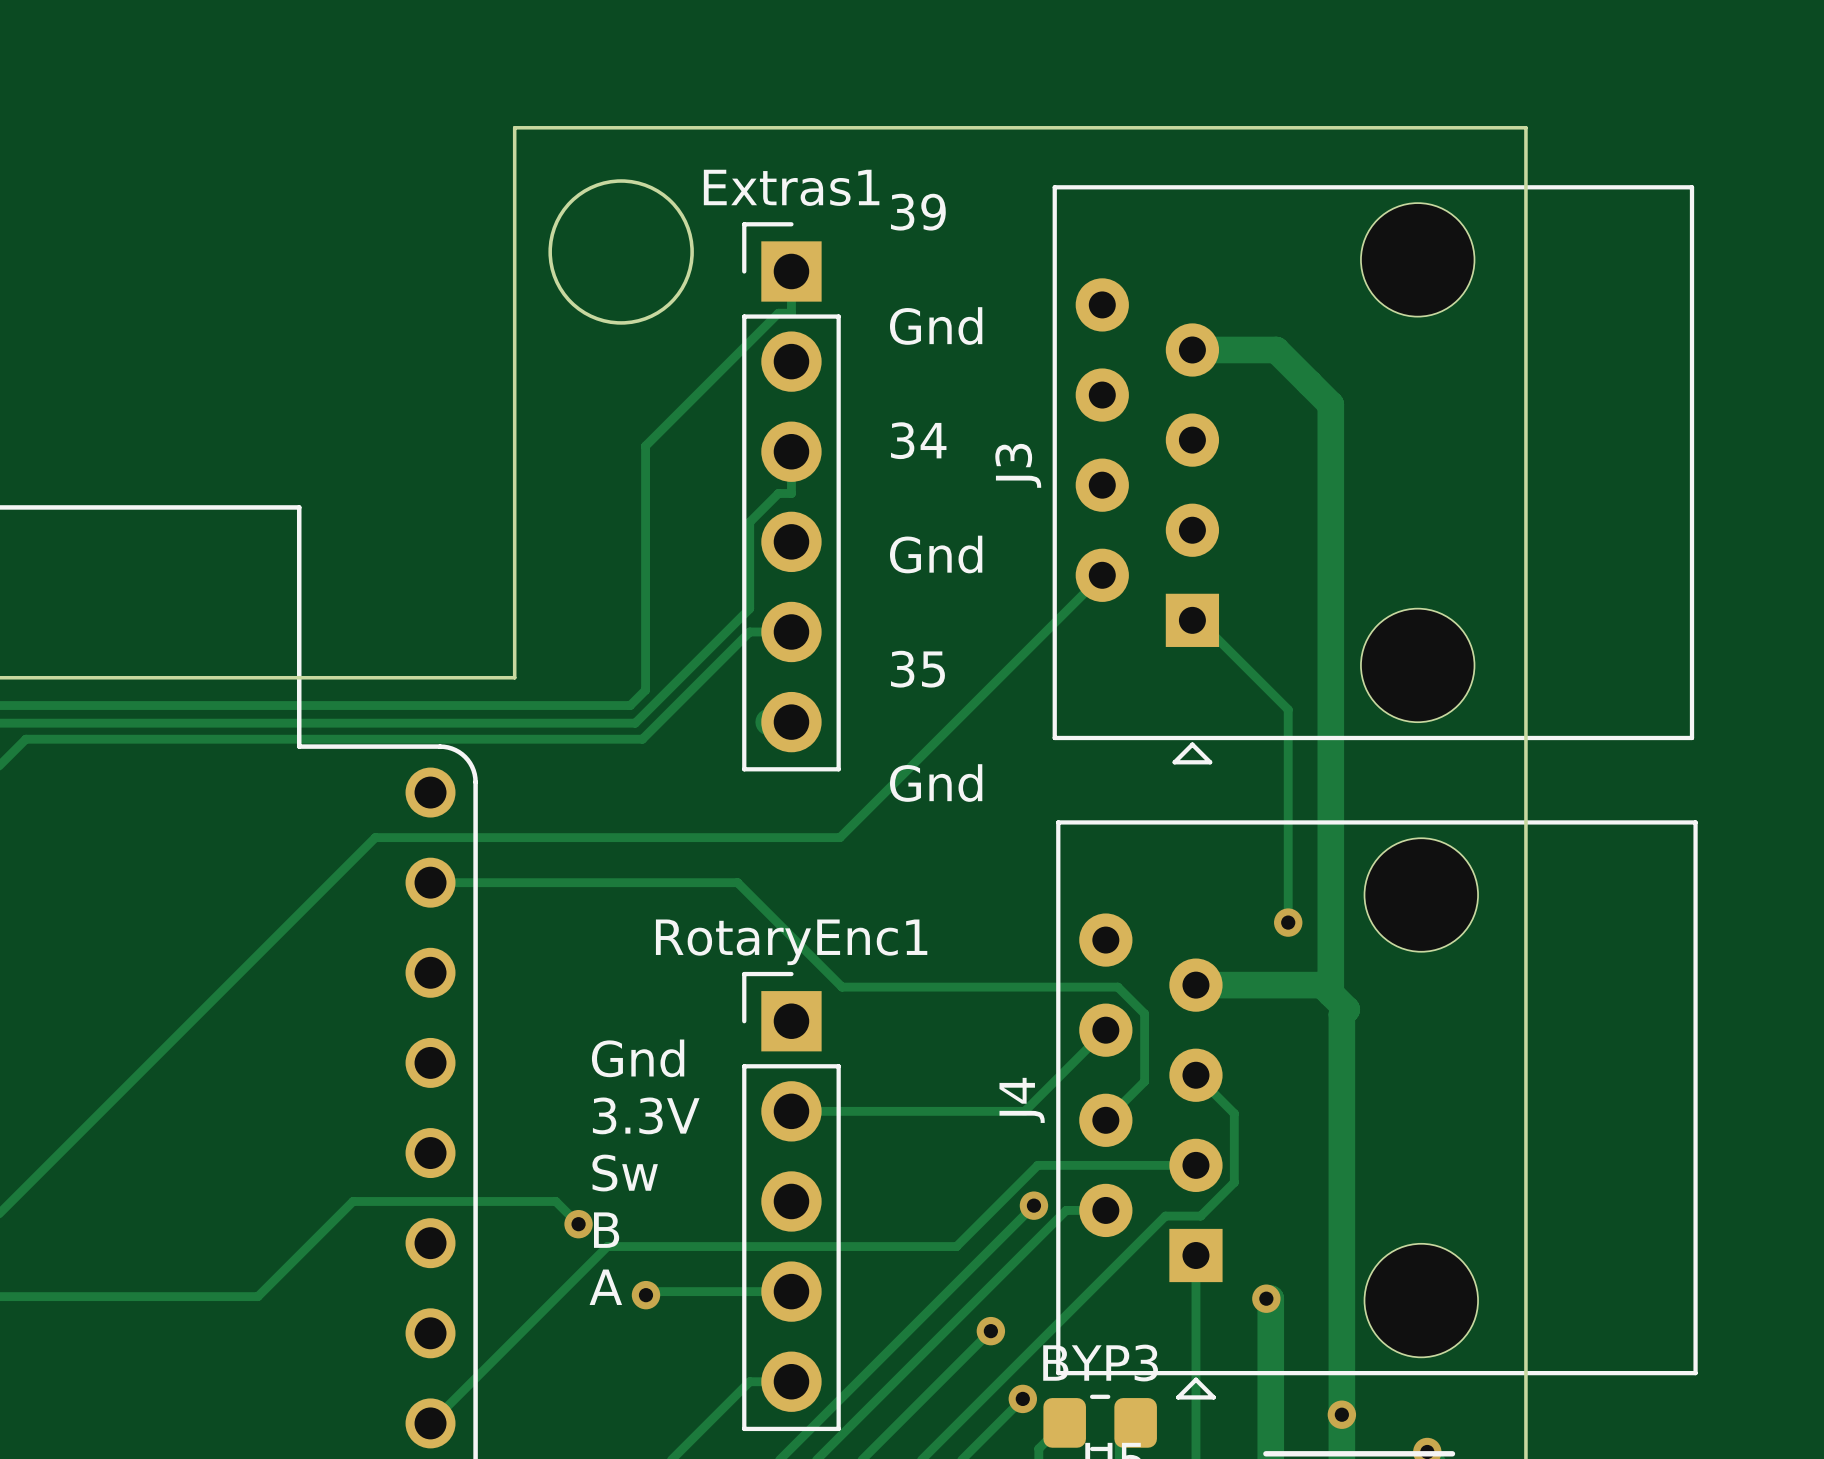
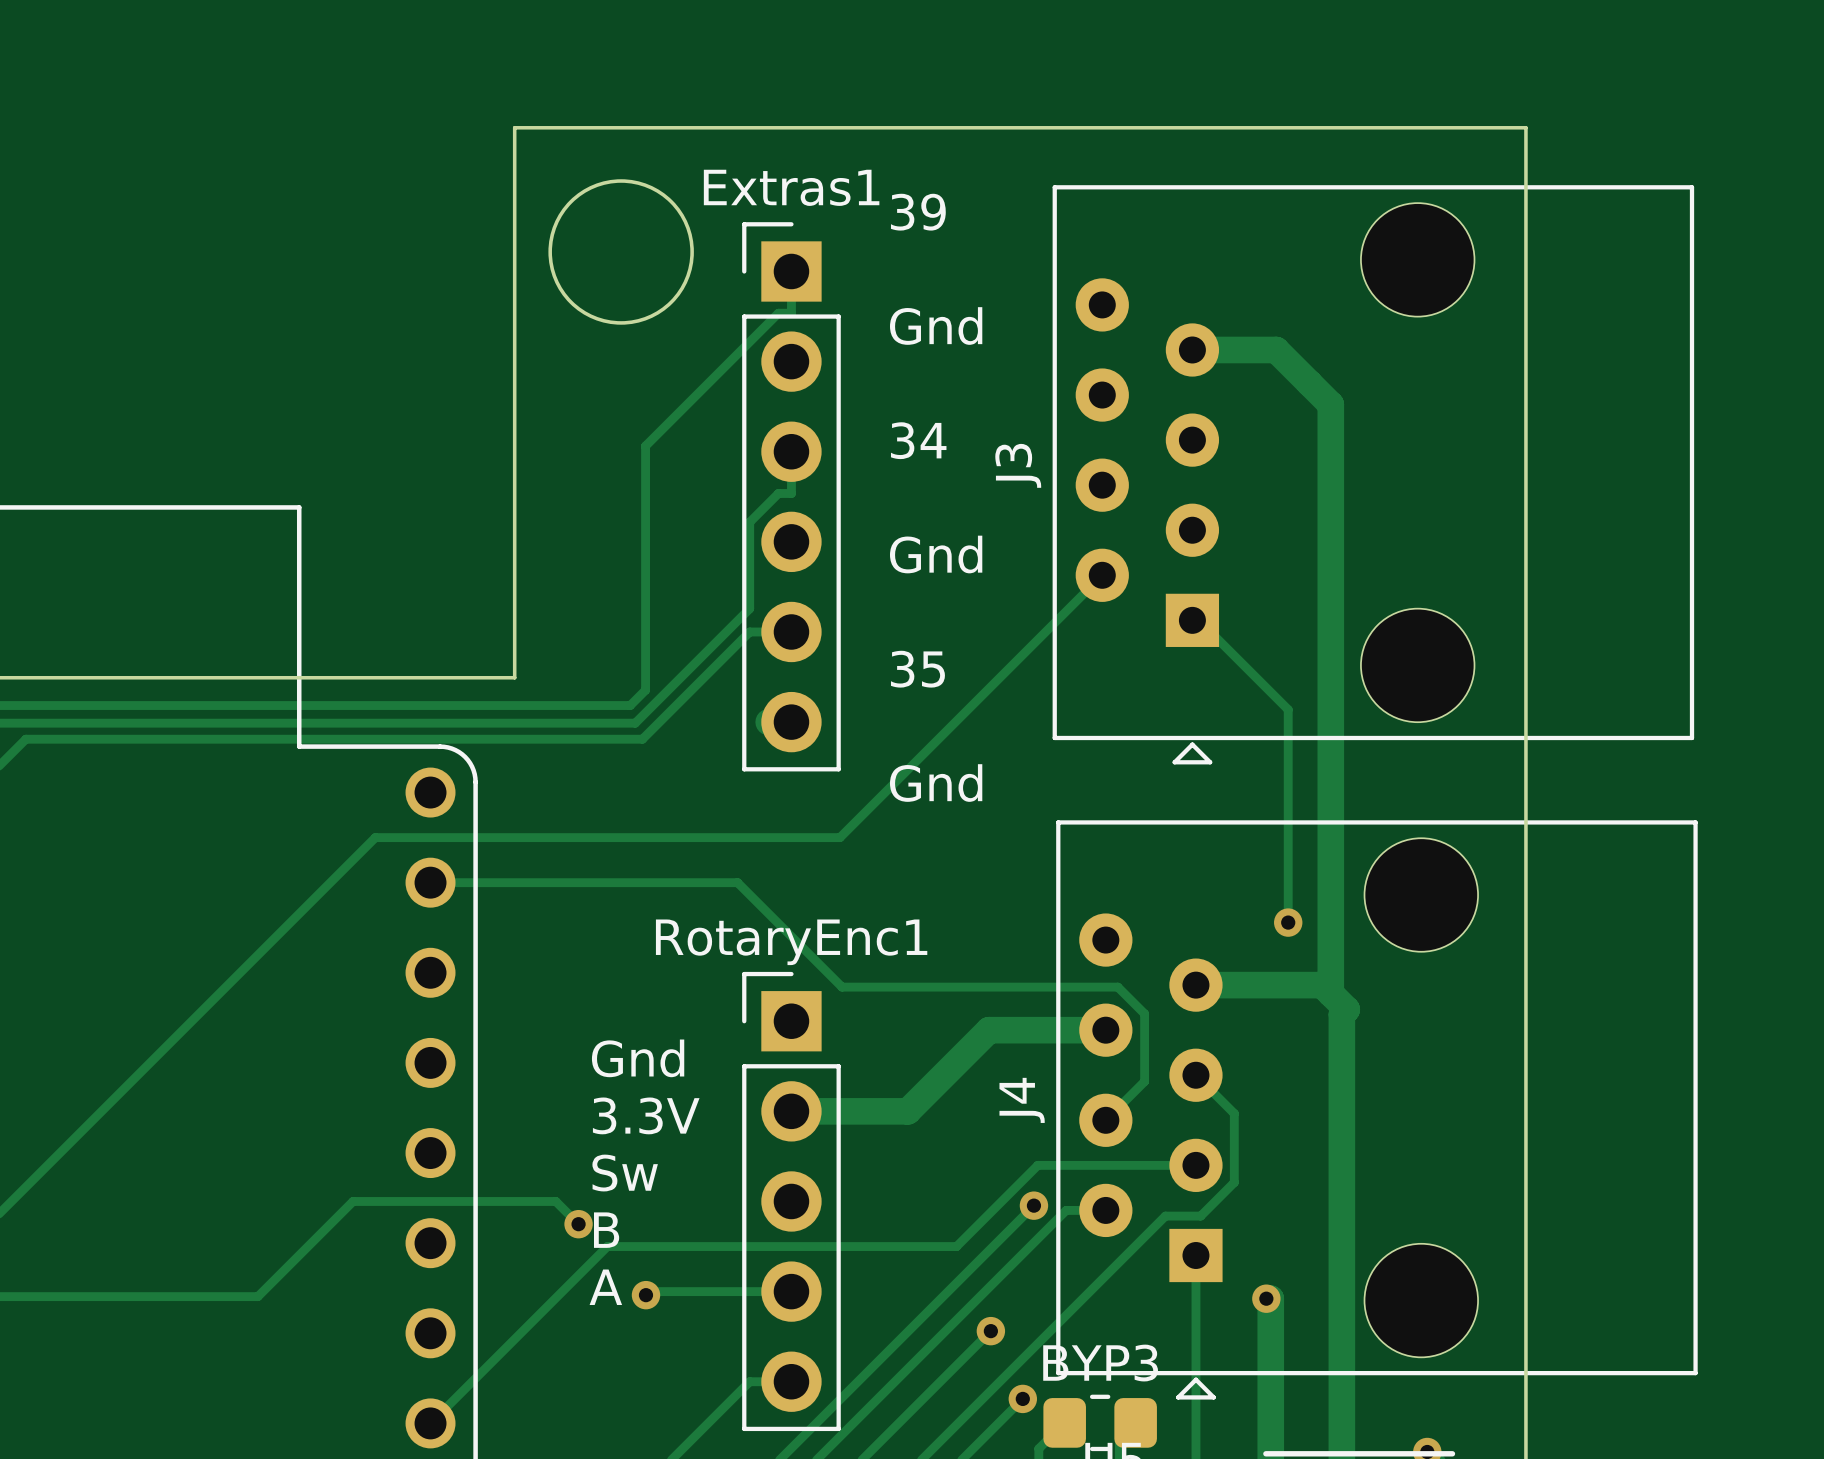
track: (1105, 1030) (1024, 1111) (907, 1111) -> (1105, 1030) (989, 1030) (907, 1111)
track width: thin (791, 1111) (907, 1111) -> thick (791, 1111) (907, 1111)
via: (1341, 1414) -> none

